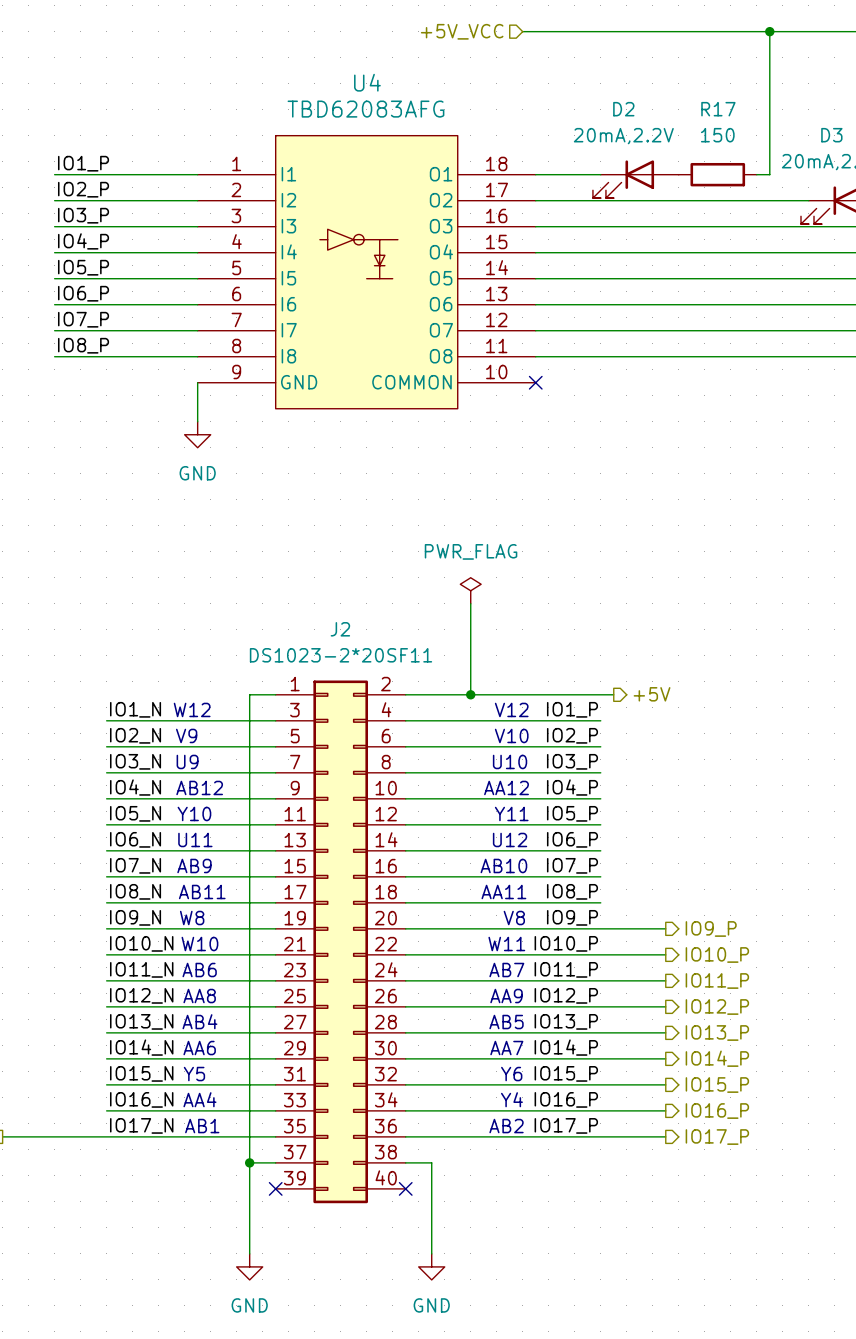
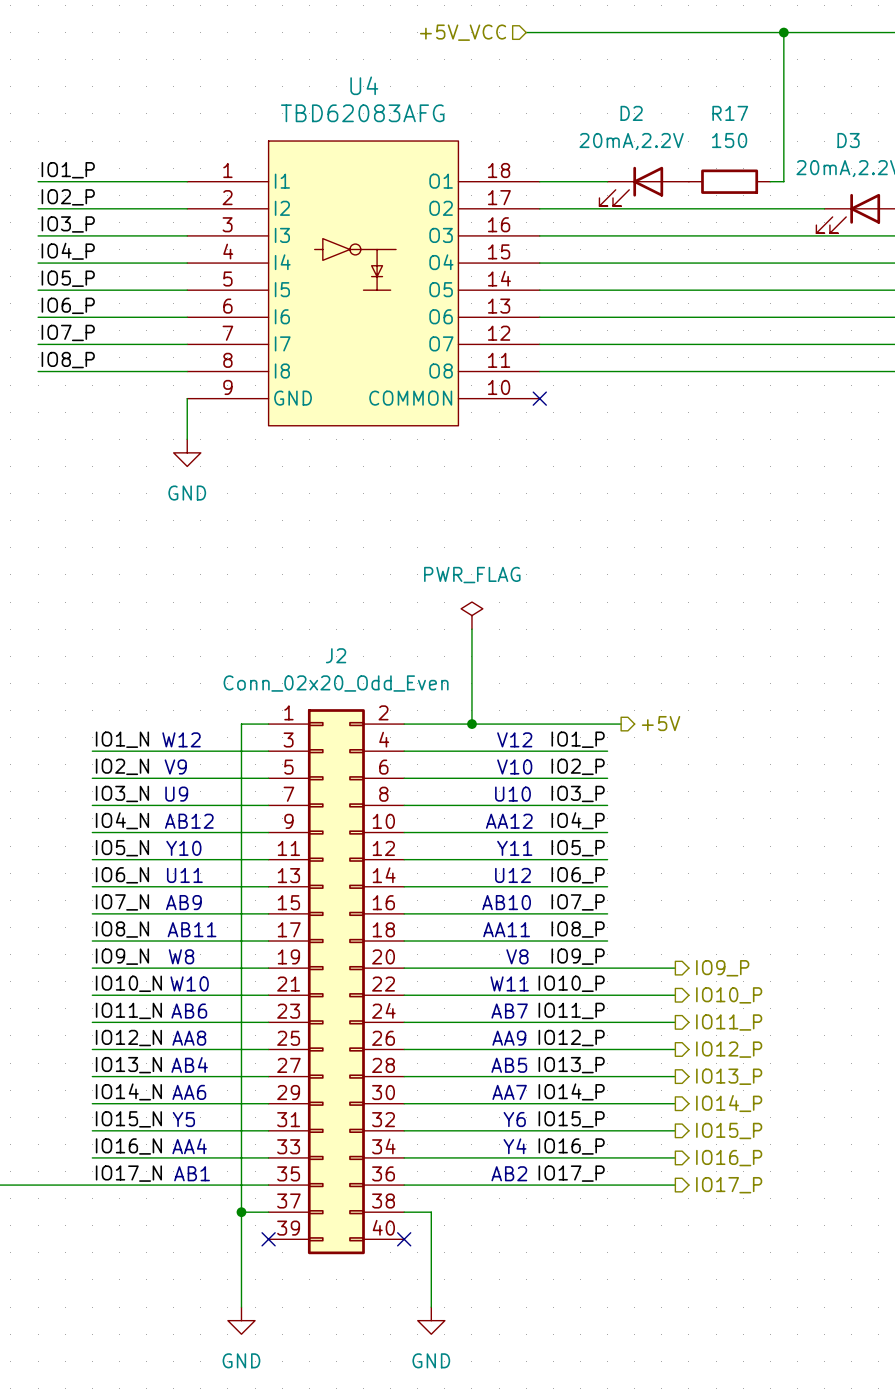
J2 value: DS1023-2*20SF11 (341, 655) -> Conn_02x20_Odd_Even (336, 683)

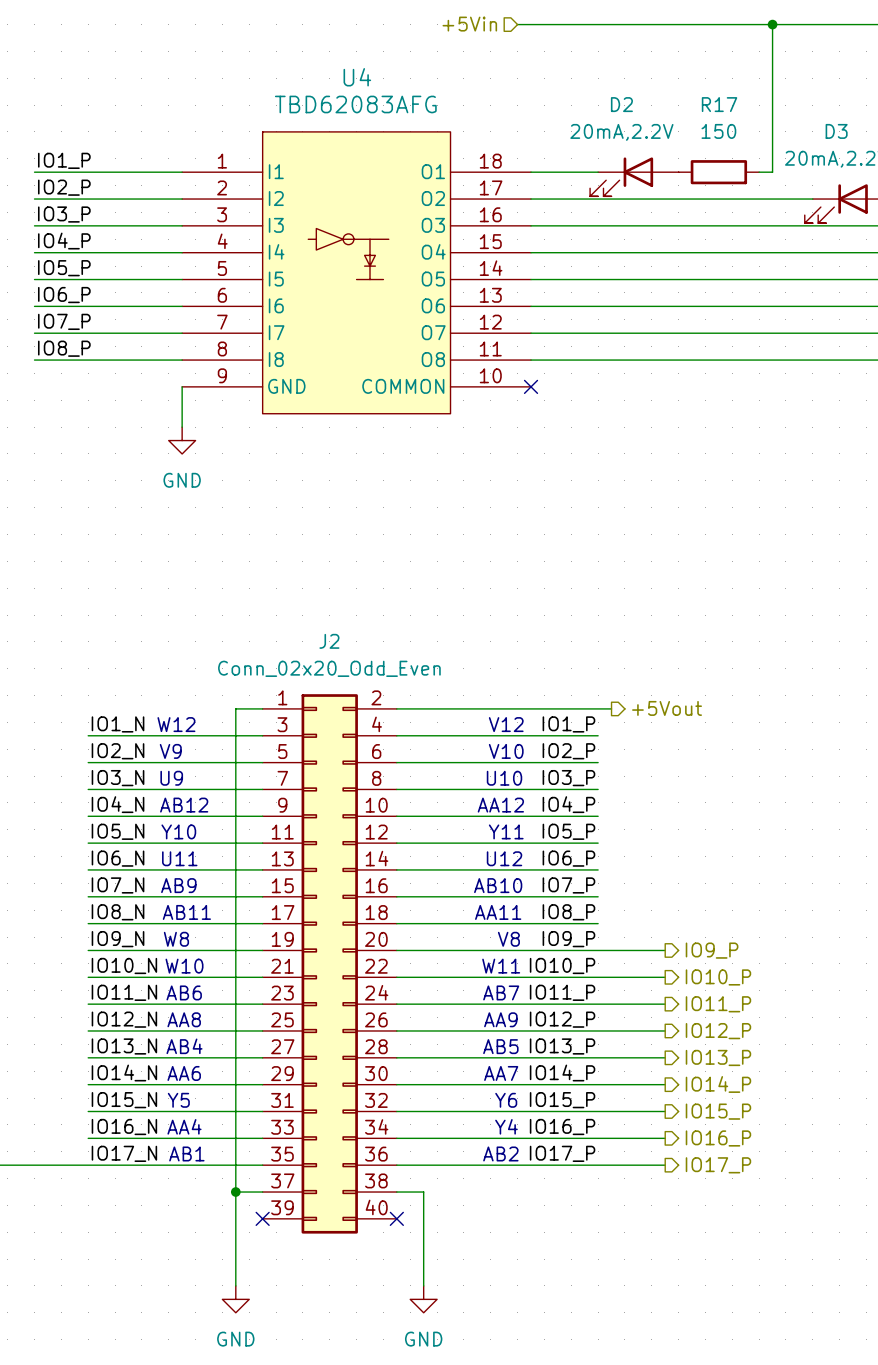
hierarchical label: +5V_VCC (463, 32) -> +5Vin (469, 24)
power symbol: PWR_FLAG (471, 615) -> none
wire: (471, 629) (471, 724) -> none
hierarchical label: +5V (661, 723) -> +5Vout (667, 708)
junction: (471, 724) -> none

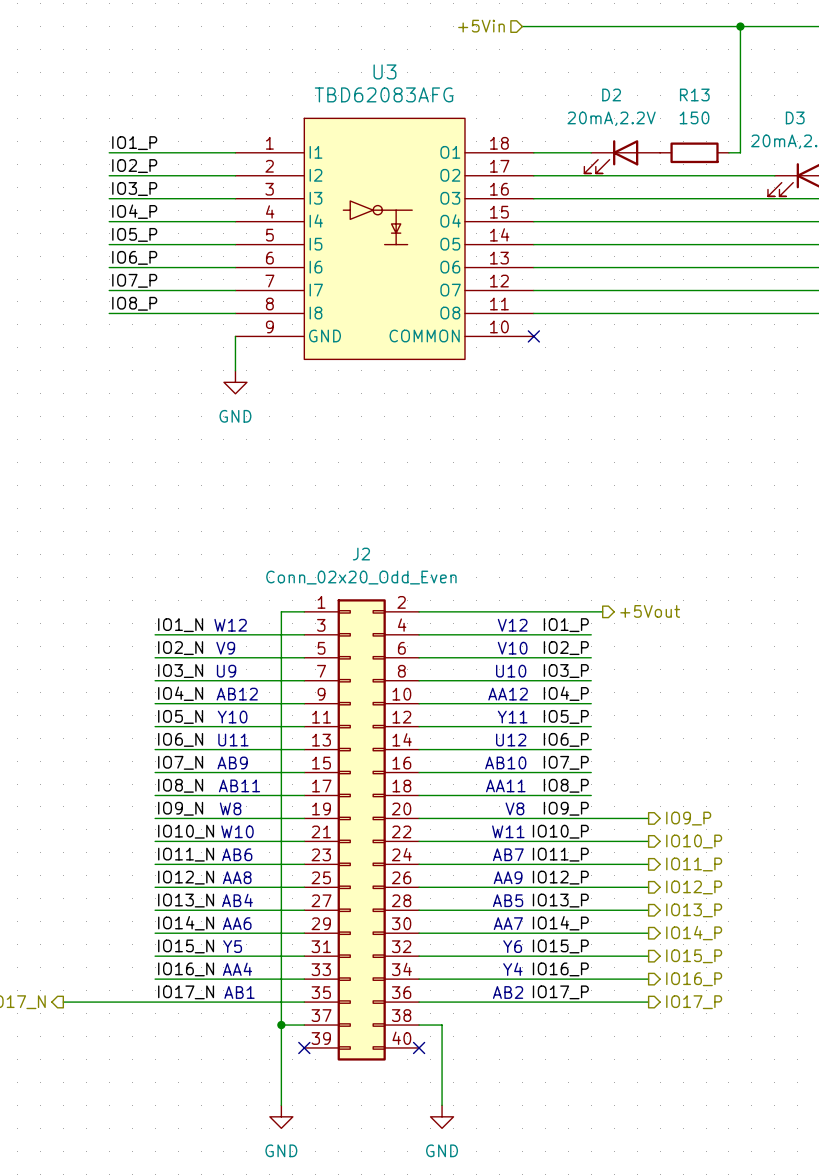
U4 name: U4 (357, 77) -> U3 (384, 71)
R17 name: R17 (719, 104) -> R13 (694, 94)

